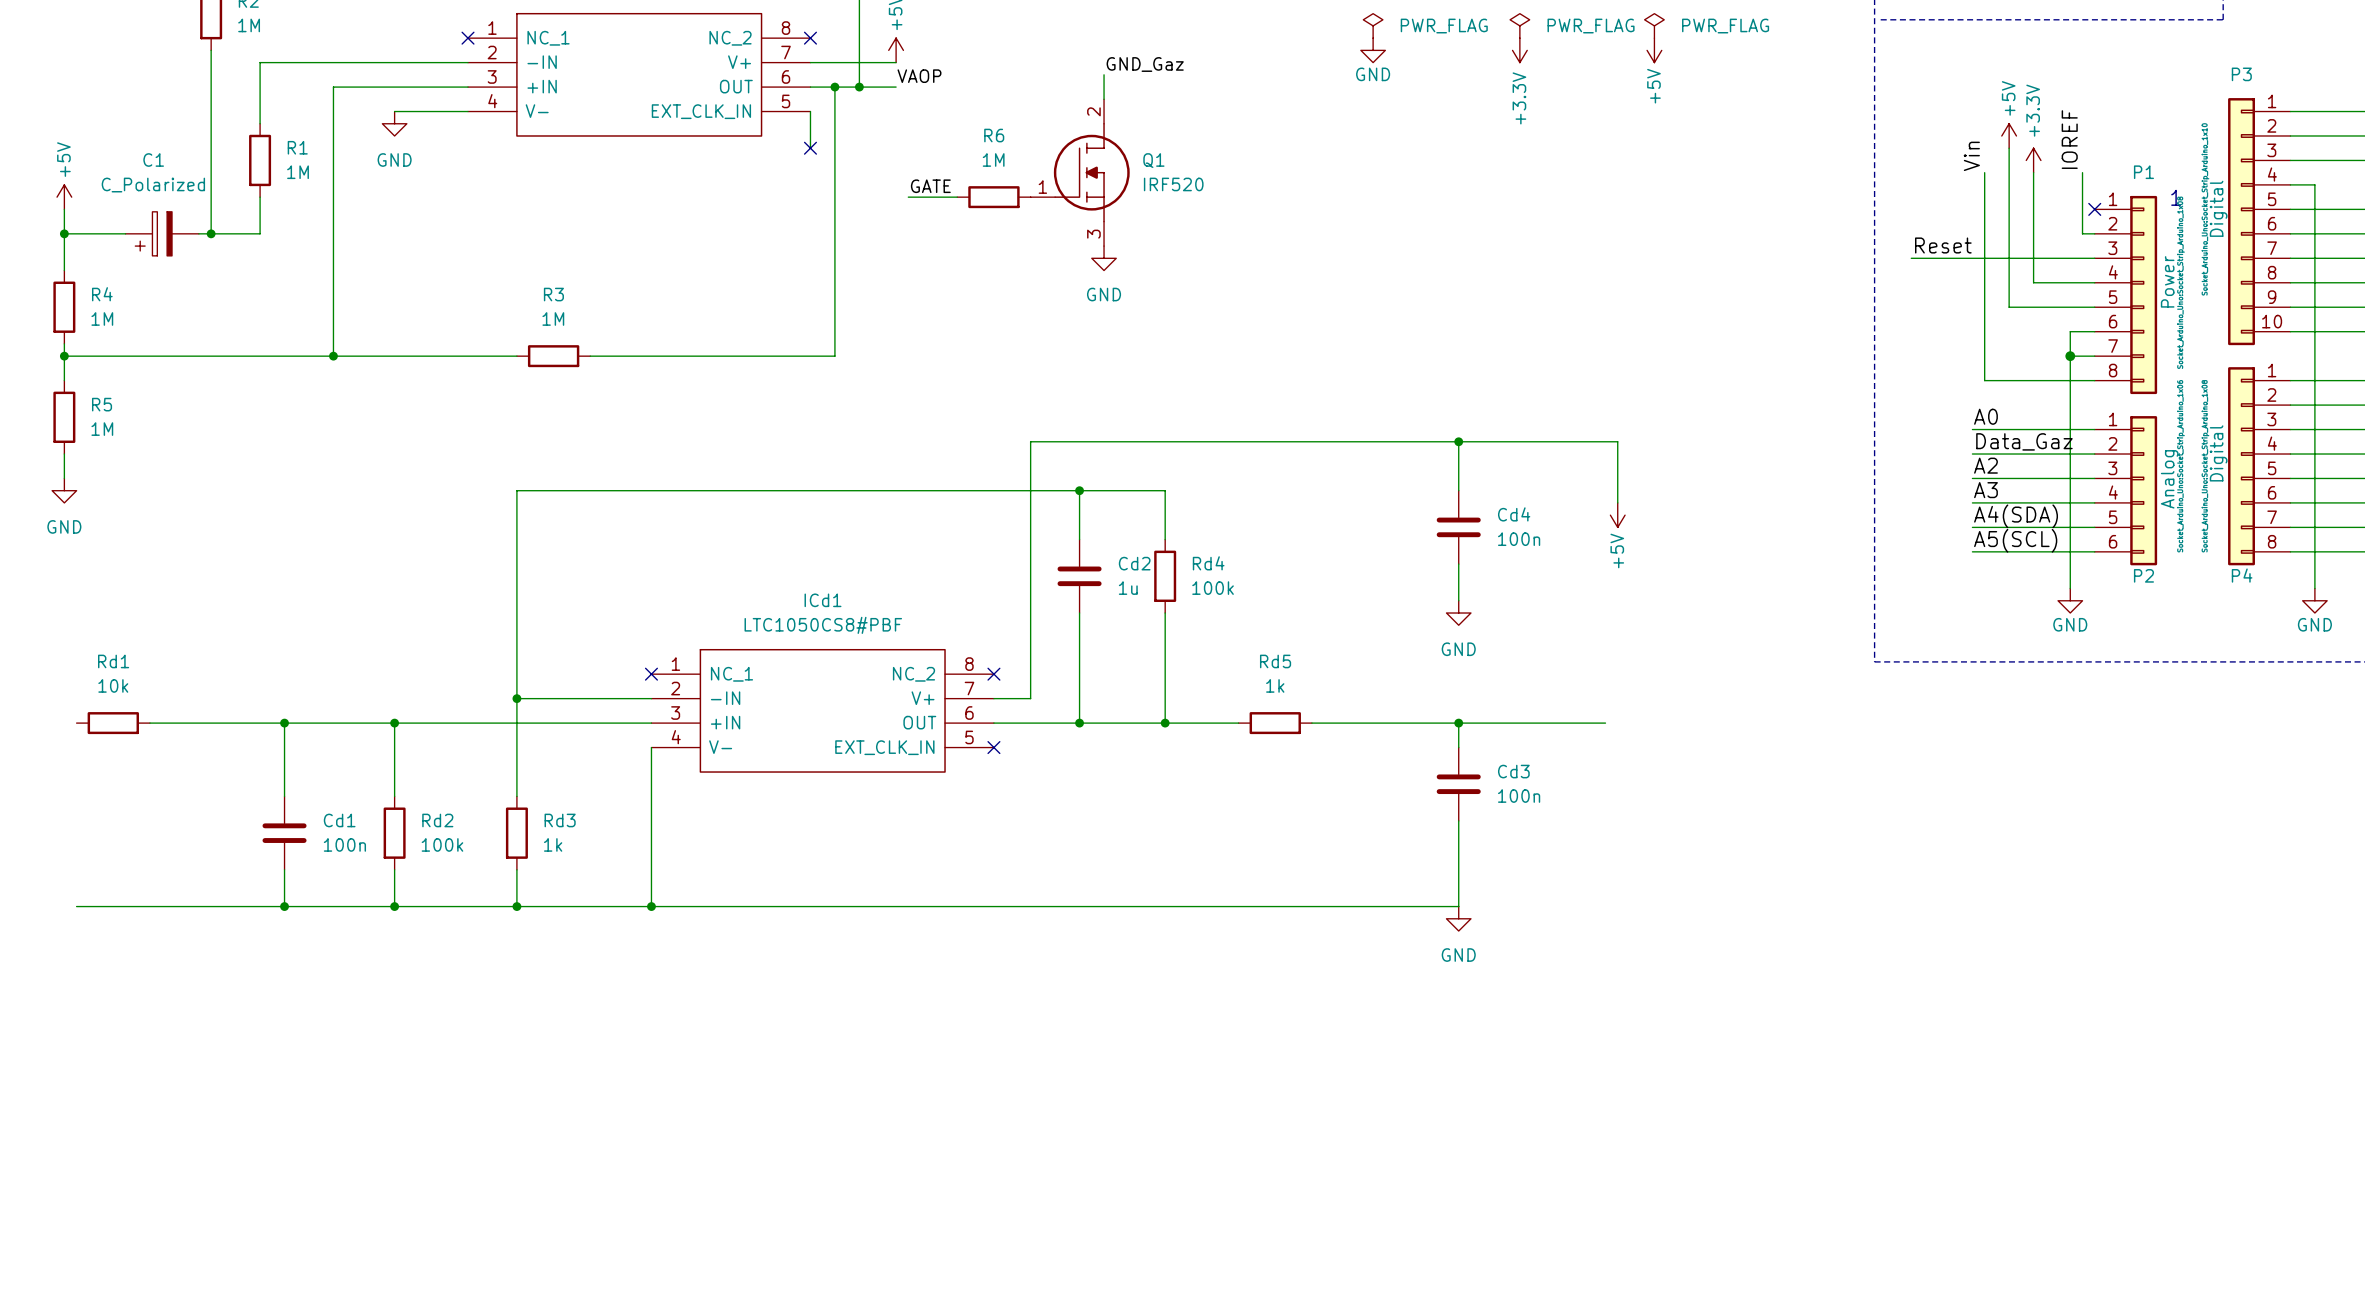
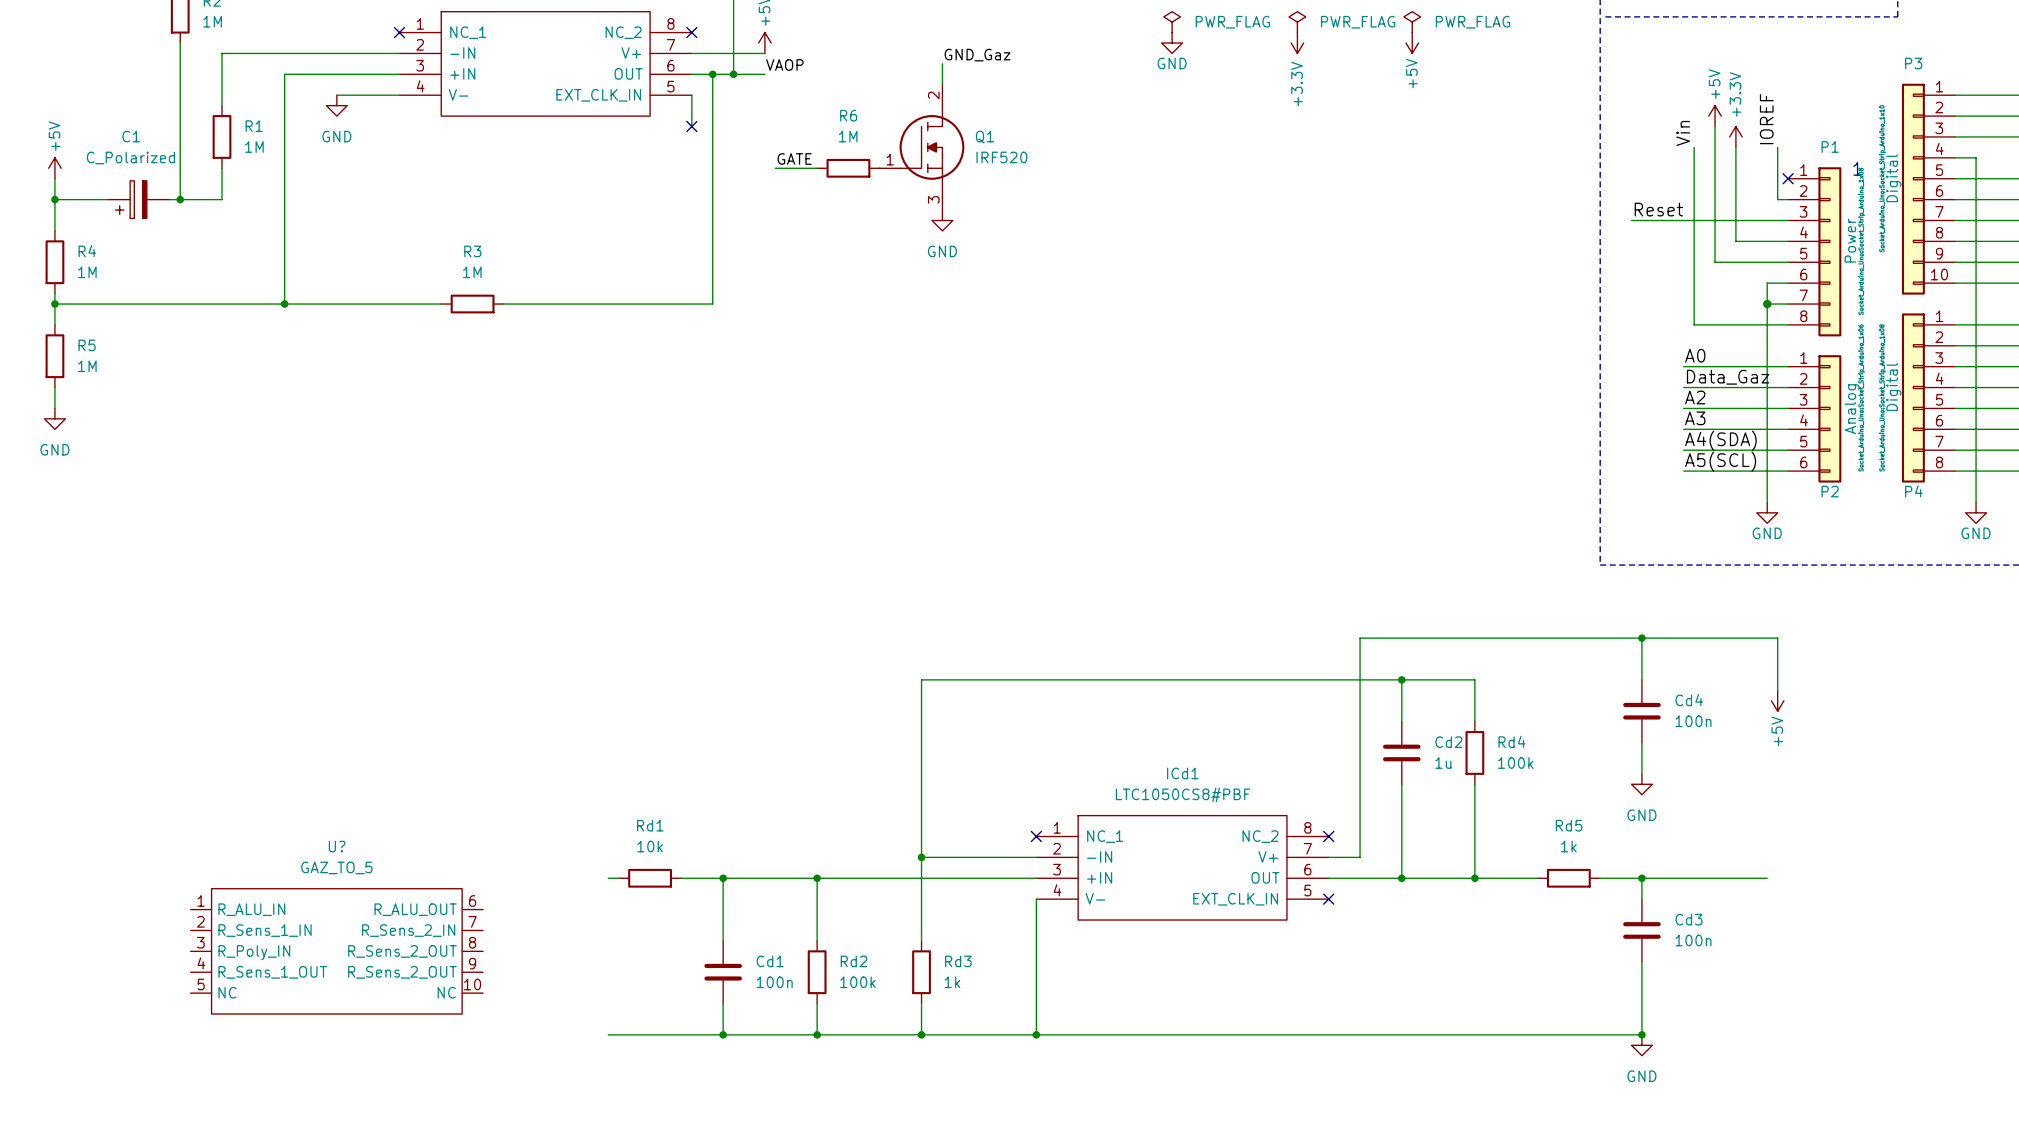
wire: (1458, 441) (1458, 490) -> none
junction: (1458, 441) -> none
wire: (1079, 490) (1079, 539) -> none
junction: (1079, 490) -> none
wire: (1617, 502) (1617, 441) (1030, 441) (1030, 698) (993, 698) -> none
power symbol: +5V (1617, 515) -> none
Cd4 position: (1458, 527) -> (1641, 711)
wire: (1165, 539) (1165, 490) (516, 490) (516, 796) -> none
wire: (1458, 564) (1458, 600) -> none
Cd2 position: (1079, 576) -> (1401, 752)
Rd4 position: (1165, 576) -> (1474, 752)
wire: (1079, 613) (1079, 723) -> none
wire: (1165, 613) (1165, 723) -> none
power symbol: GND (1458, 613) -> none
no-connect mark: (651, 674) -> none
no-connect mark: (993, 674) -> none
wire: (516, 698) (651, 698) -> none
junction: (516, 698) -> none
ICd1 position: (822, 710) -> (1182, 867)
Rd1 position: (113, 723) -> (650, 878)
wire: (149, 723) (651, 723) -> none
wire: (284, 723) (284, 796) -> none
junction: (284, 723) -> none
wire: (394, 723) (394, 796) -> none
junction: (394, 723) -> none
wire: (993, 723) (1238, 723) -> none
junction: (1079, 723) -> none
junction: (1165, 723) -> none
Rd5 position: (1275, 723) -> (1568, 878)
wire: (1311, 723) (1605, 723) -> none
wire: (1458, 723) (1458, 747) -> none
junction: (1458, 723) -> none
wire: (651, 747) (651, 906) -> none
no-connect mark: (993, 747) -> none
wire: none -> (1641, 638) (1641, 679)
junction: none -> (1641, 638)
Cd3 position: (1458, 784) -> (1641, 930)
wire: none -> (1401, 679) (1401, 721)
junction: none -> (1401, 679)
wire: none -> (1777, 690) (1777, 638) (1360, 638) (1360, 857) (1328, 857)
wire: (1458, 820) (1458, 906) (76, 906) -> none
power symbol: none -> +5V (1777, 700)
Cd1 position: (284, 833) -> (723, 972)
Rd2 position: (394, 833) -> (817, 972)
Rd3 position: (516, 833) -> (921, 972)
wire: none -> (1474, 721) (1474, 679) (921, 679) (921, 940)
wire: (284, 869) (284, 906) -> none
wire: (394, 869) (394, 906) -> none
wire: (516, 869) (516, 906) -> none
wire: none -> (1641, 742) (1641, 773)
junction: (284, 906) -> none
junction: (394, 906) -> none
junction: (516, 906) -> none
junction: (651, 906) -> none
power symbol: GND (1458, 918) -> none
wire: none -> (1401, 784) (1401, 878)
wire: none -> (1474, 784) (1474, 878)
power symbol: none -> GND (1641, 784)
no-connect mark: none -> (1036, 836)
no-connect mark: none -> (1328, 836)
wire: none -> (921, 857) (1036, 857)
junction: none -> (921, 857)
wire: none -> (608, 878) (618, 878)
wire: none -> (681, 878) (1036, 878)
wire: none -> (723, 878) (723, 940)
junction: none -> (723, 878)
wire: none -> (817, 878) (817, 940)
junction: none -> (817, 878)
wire: none -> (1328, 878) (1537, 878)
junction: none -> (1401, 878)
junction: none -> (1474, 878)
wire: none -> (1600, 878) (1767, 878)
wire: none -> (1641, 878) (1641, 899)
junction: none -> (1641, 878)
wire: none -> (1036, 899) (1036, 1034)
no-connect mark: none -> (1328, 899)
U?: none -> GAZ_TO_5 (336, 951)
wire: none -> (1641, 961) (1641, 1034) (608, 1034)
wire: none -> (723, 1003) (723, 1034)
wire: none -> (817, 1003) (817, 1034)
wire: none -> (921, 1003) (921, 1034)
junction: none -> (723, 1034)
junction: none -> (817, 1034)
junction: none -> (921, 1034)
junction: none -> (1036, 1034)
junction: none -> (1641, 1034)
power symbol: none -> GND (1641, 1045)

